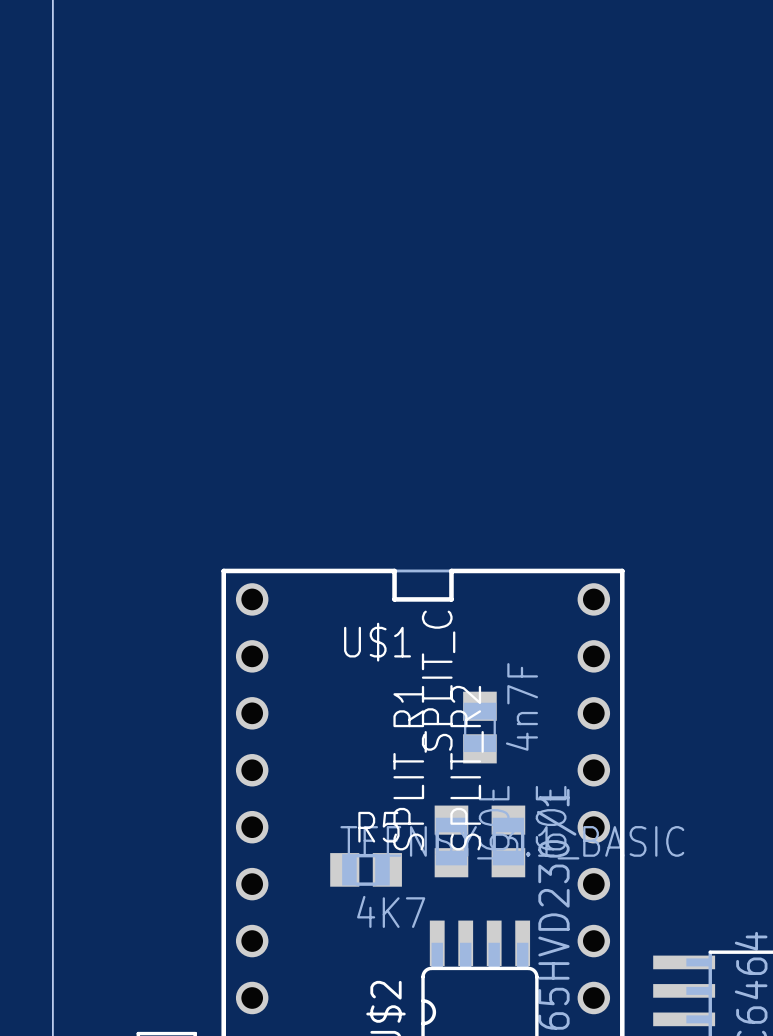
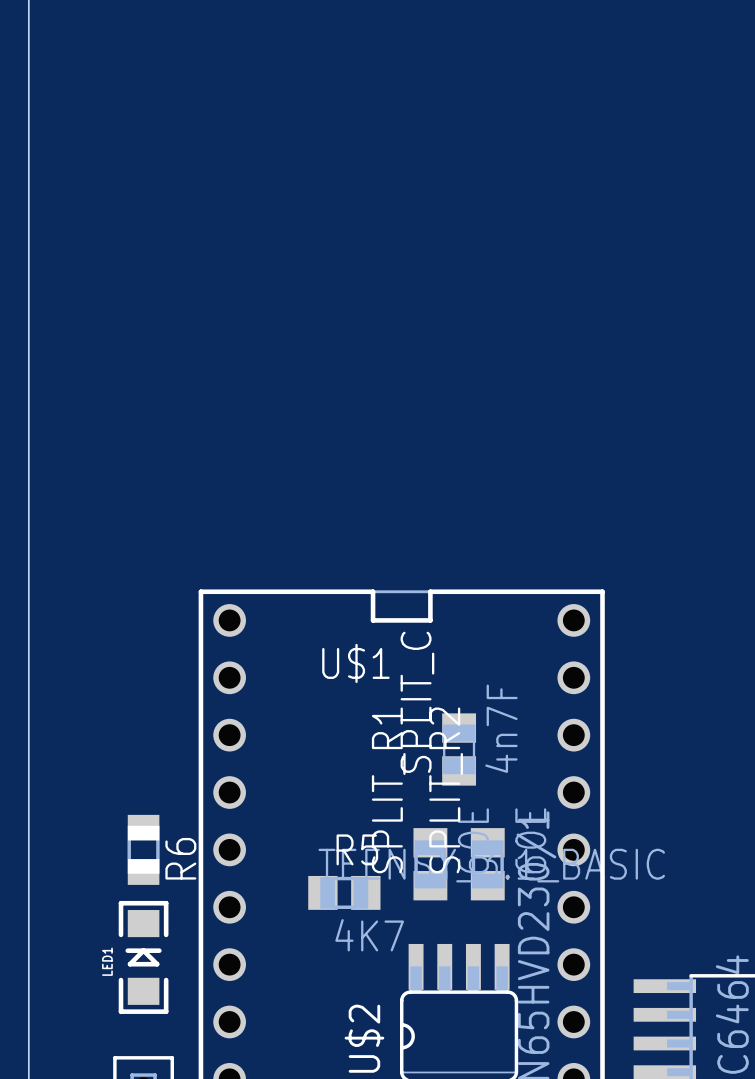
R6: none -> (143, 849)
LED1: none -> (143, 957)

